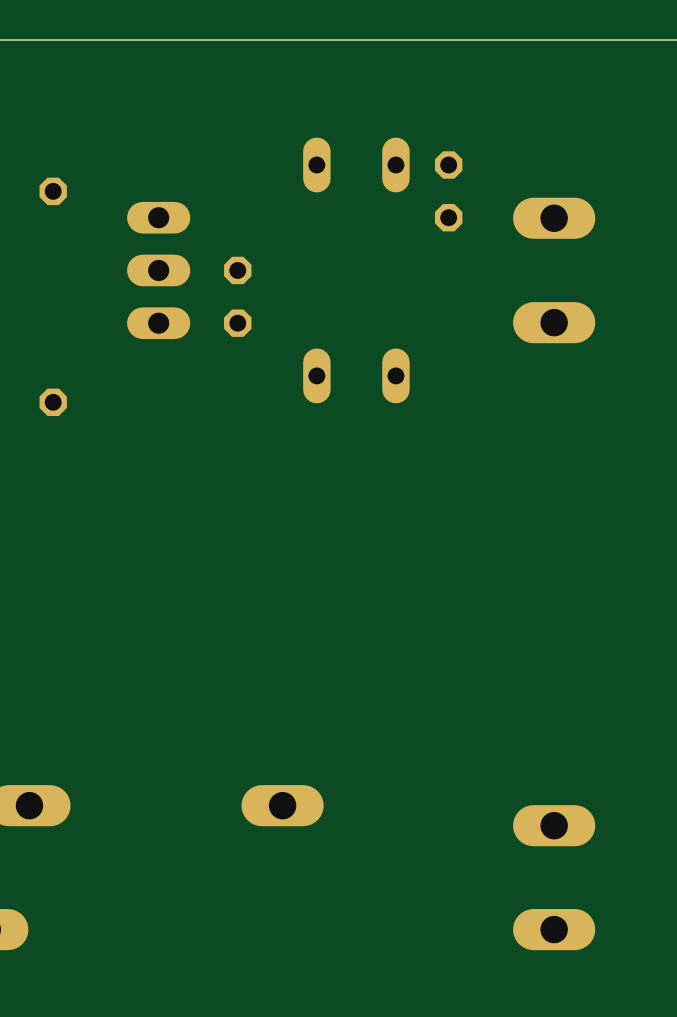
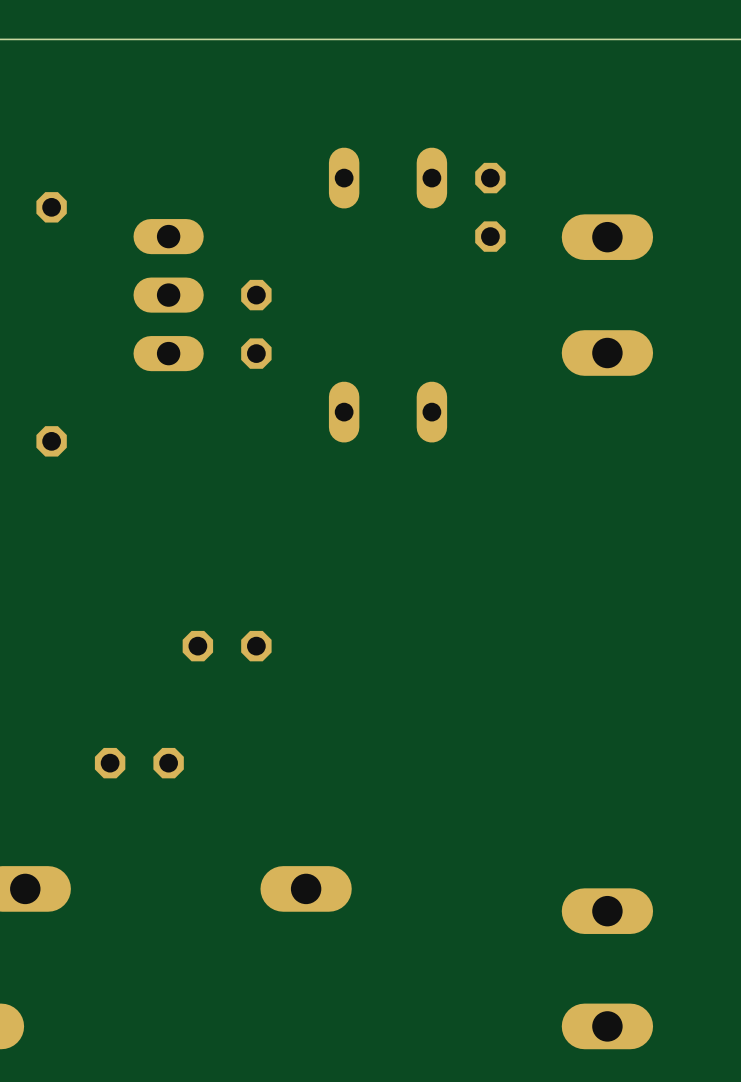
part: none -> (227, 646)
part: none -> (139, 763)

